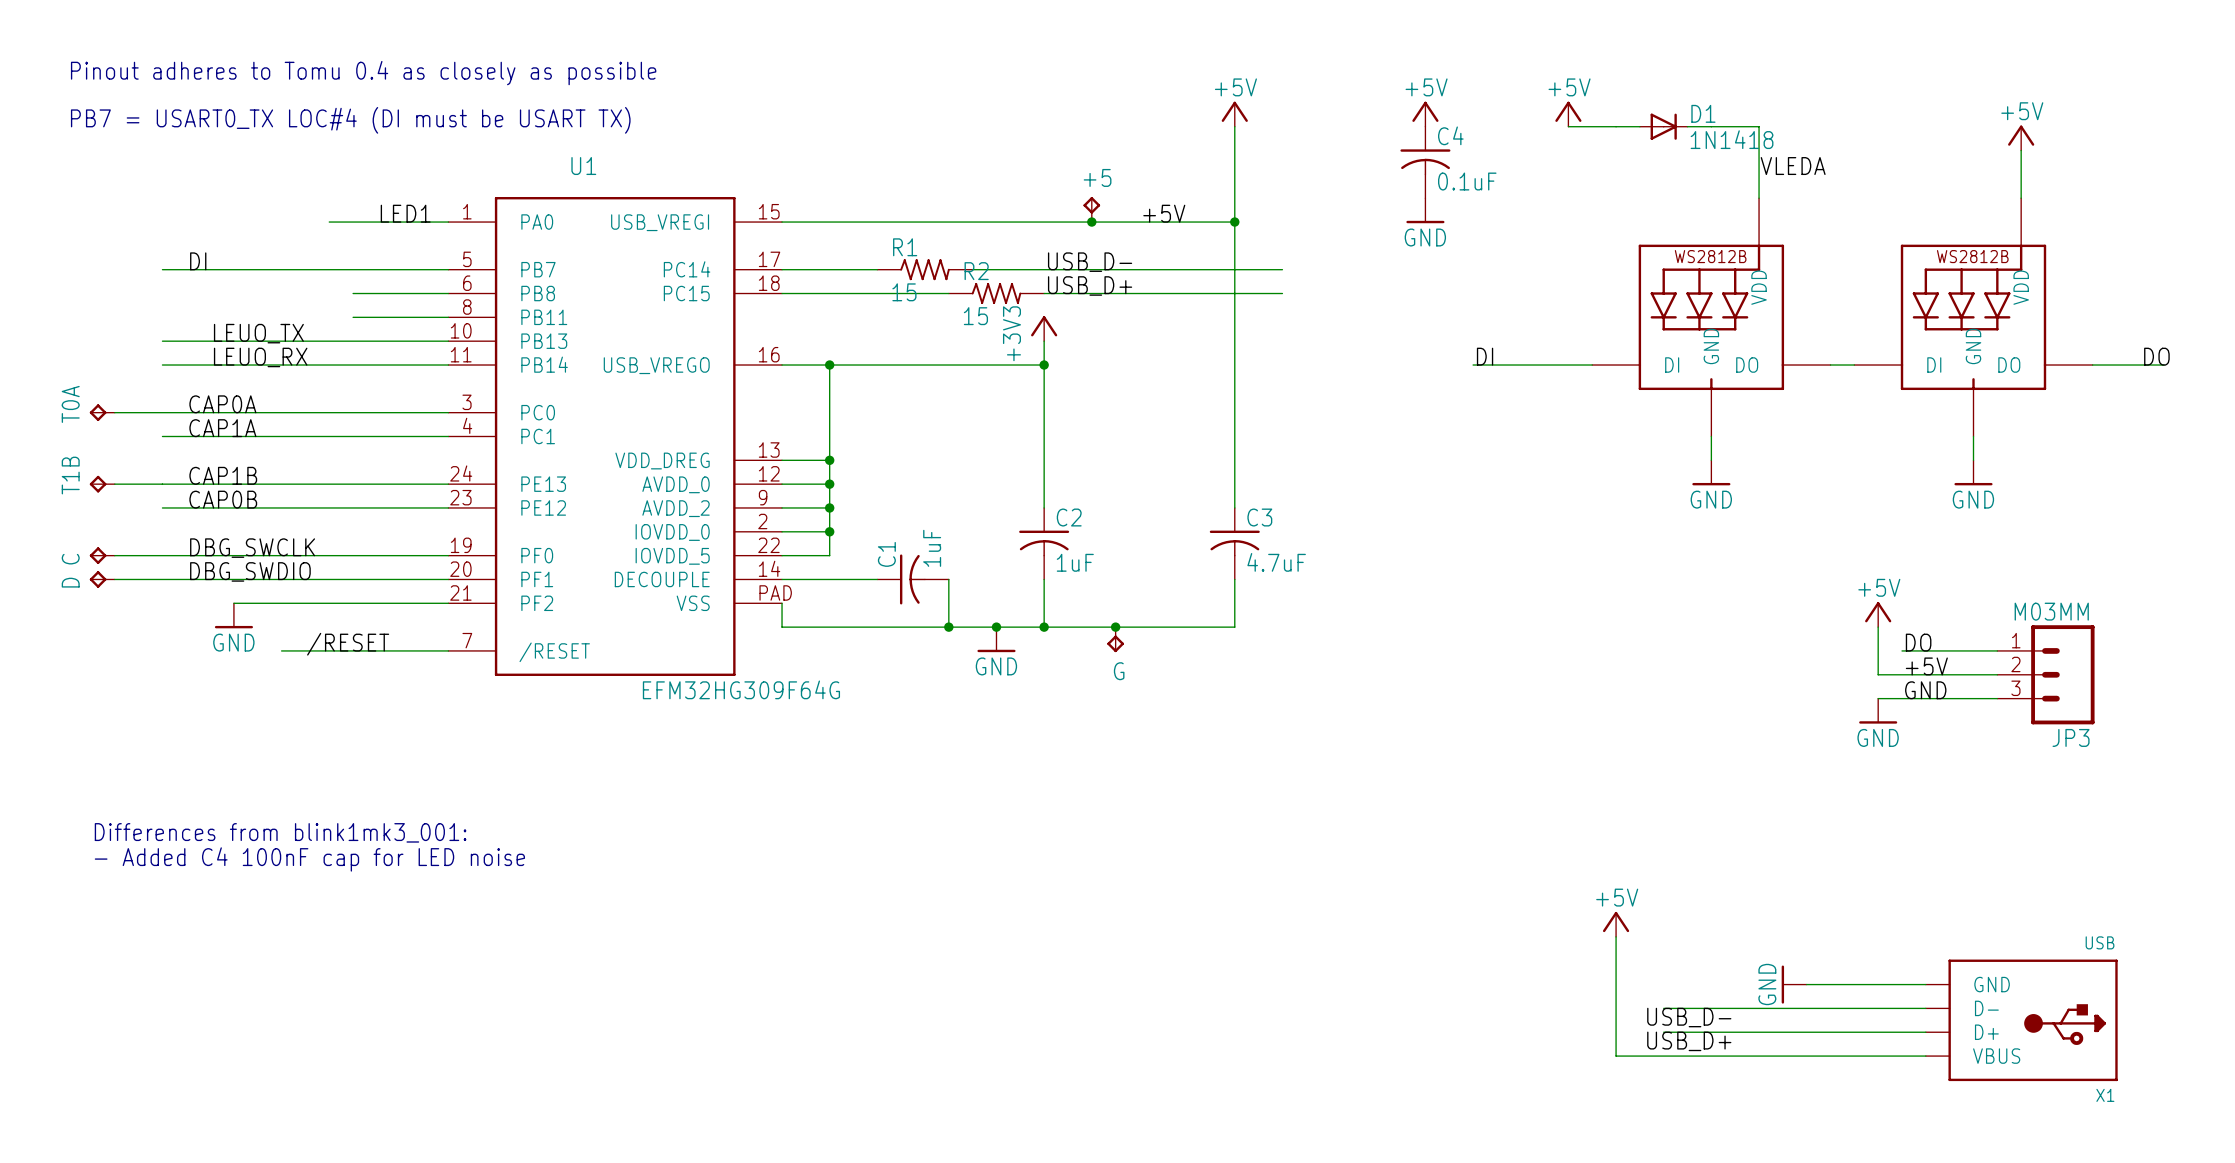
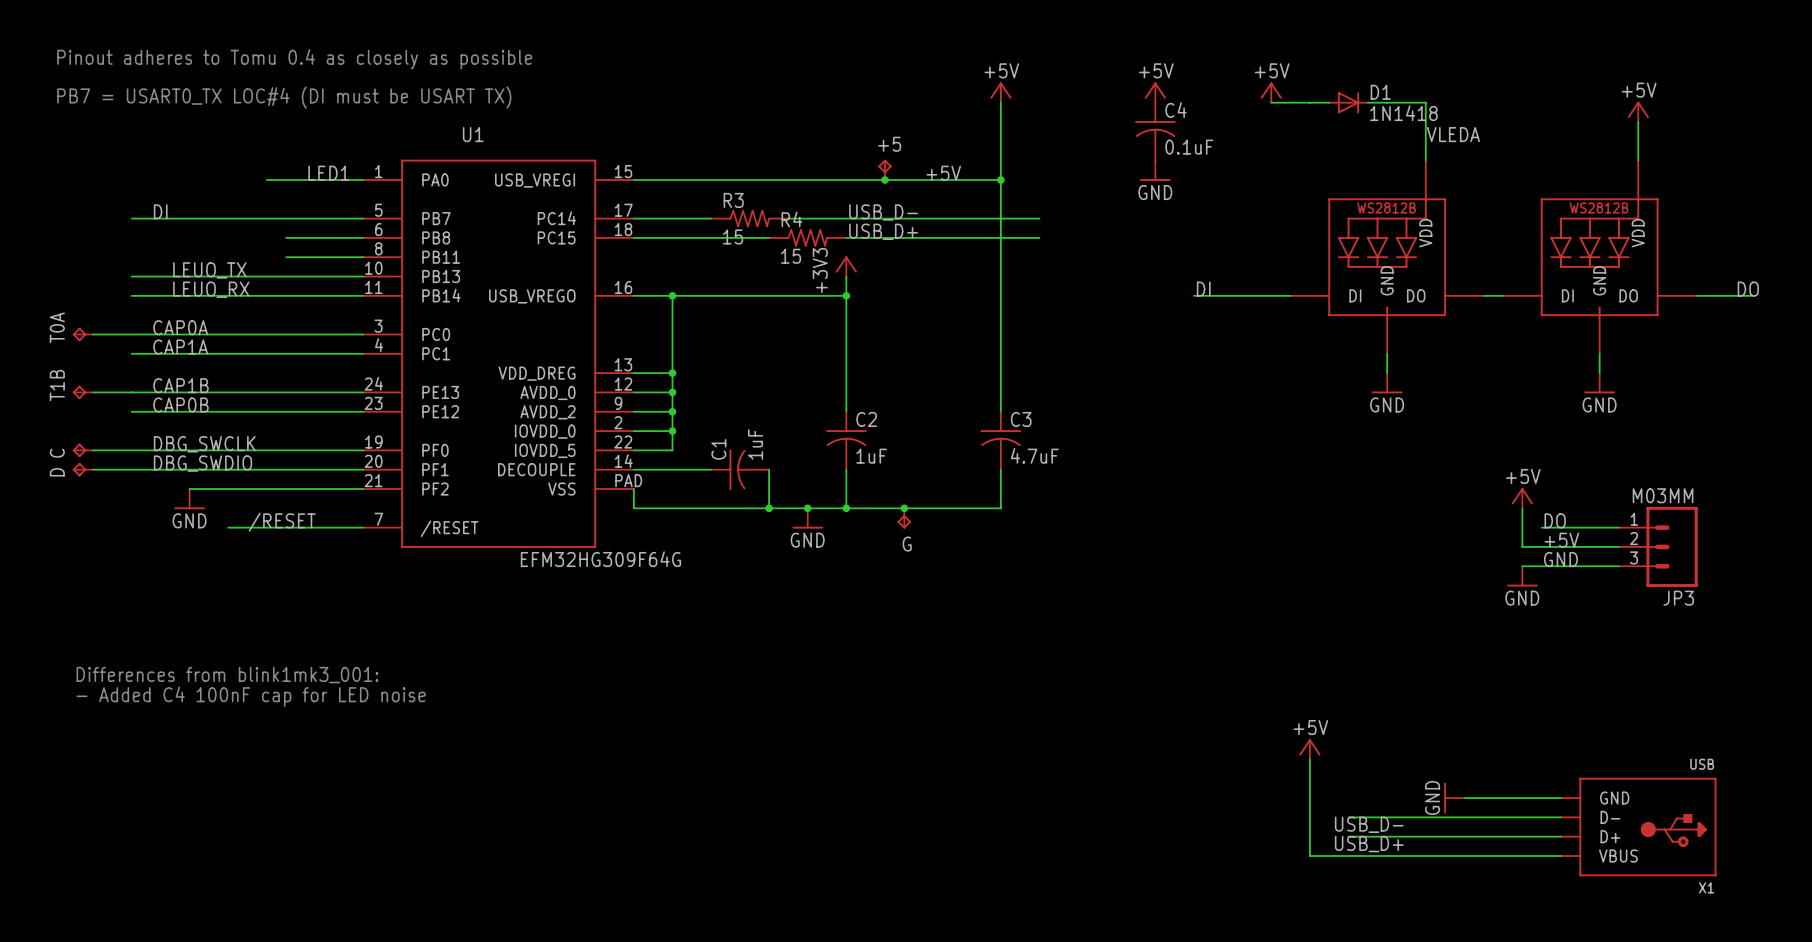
R1 name: R1 (905, 247) -> R3 (733, 200)
R2 name: R2 (976, 271) -> R4 (791, 219)

